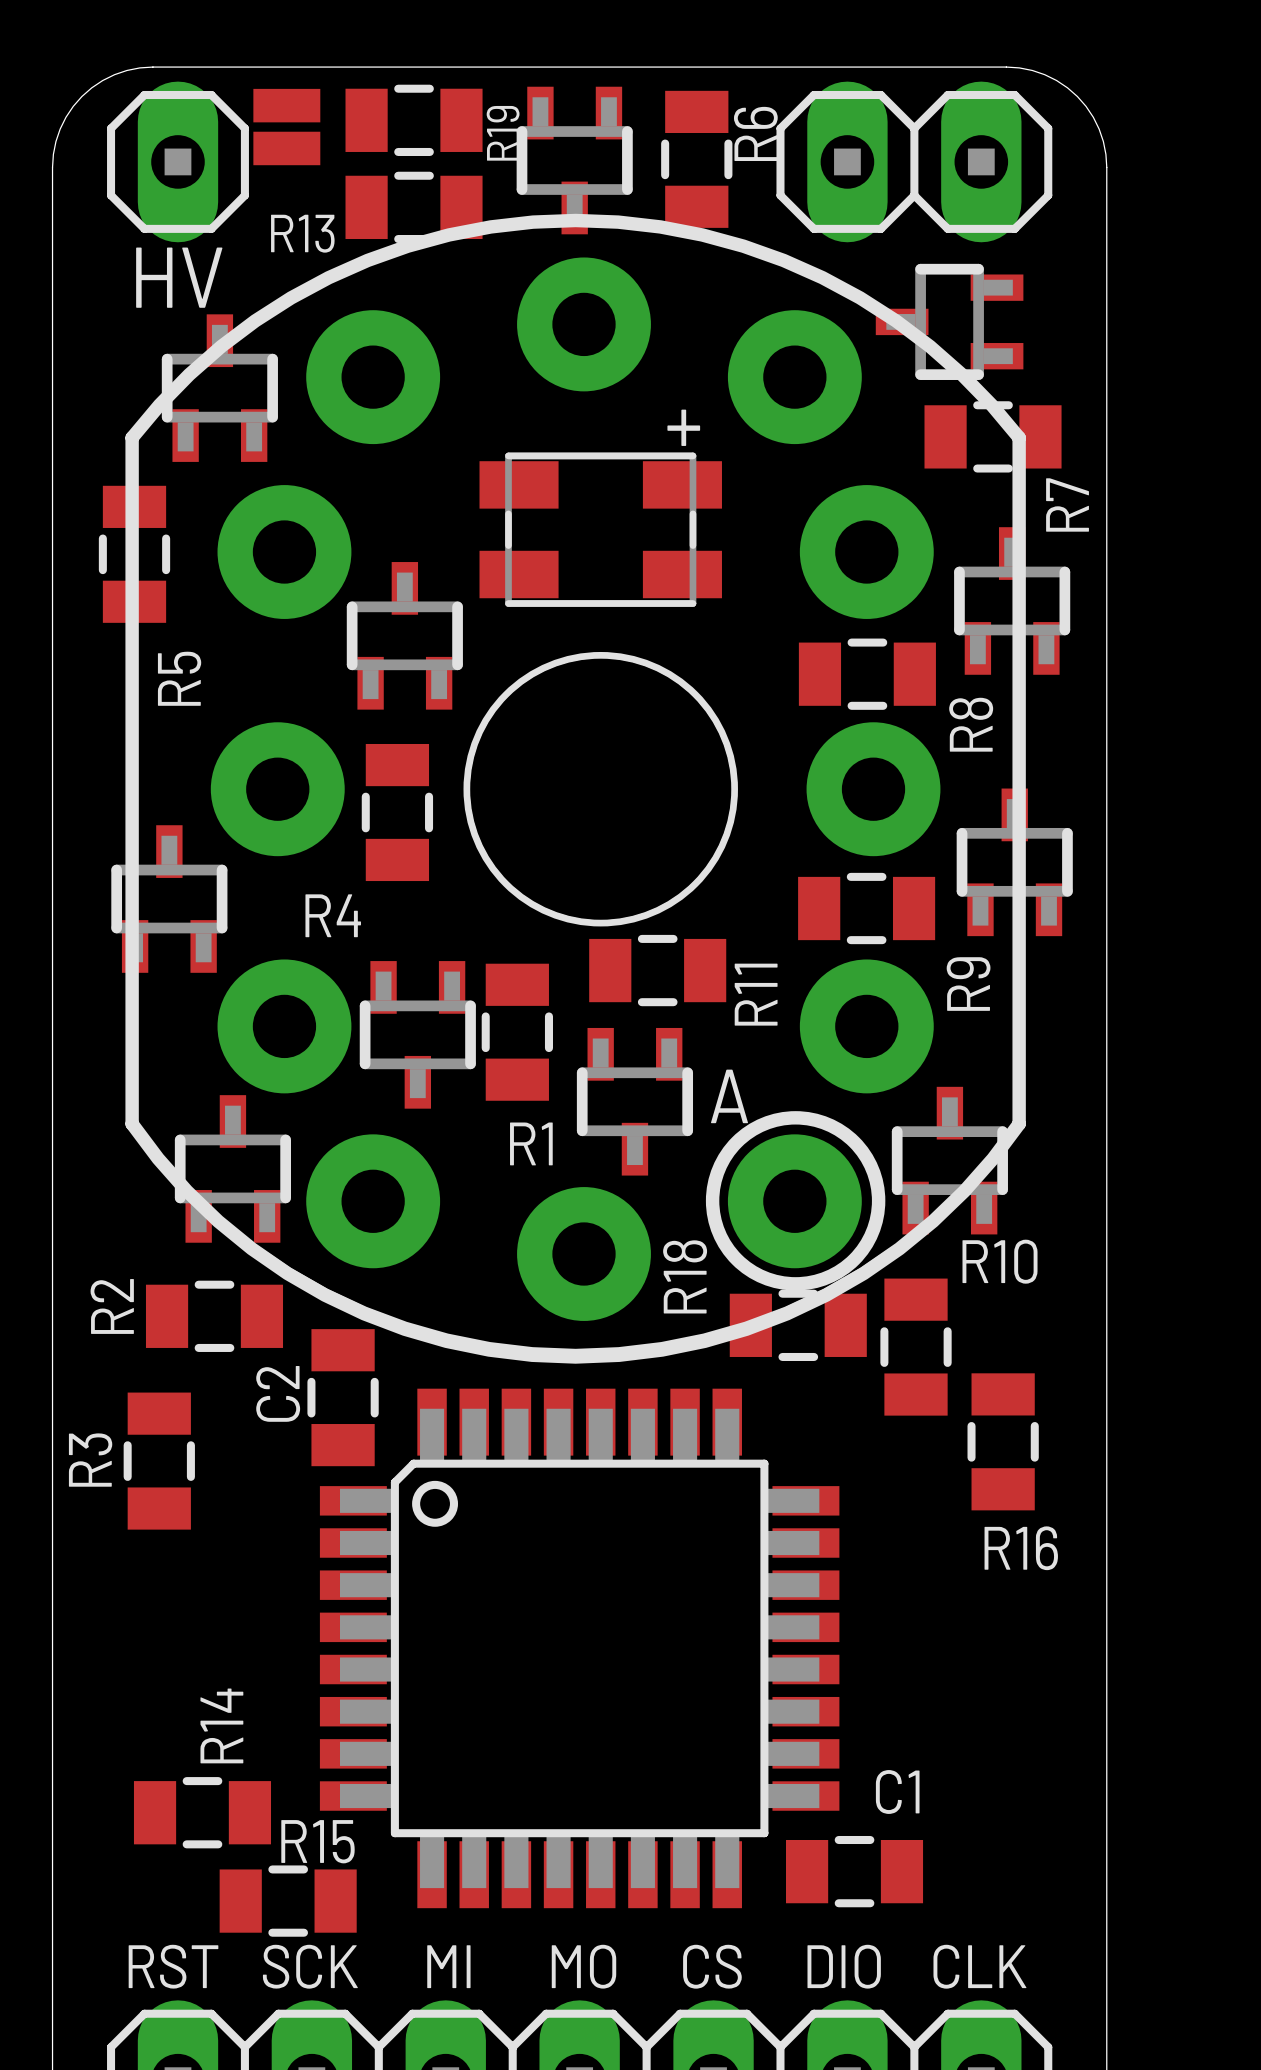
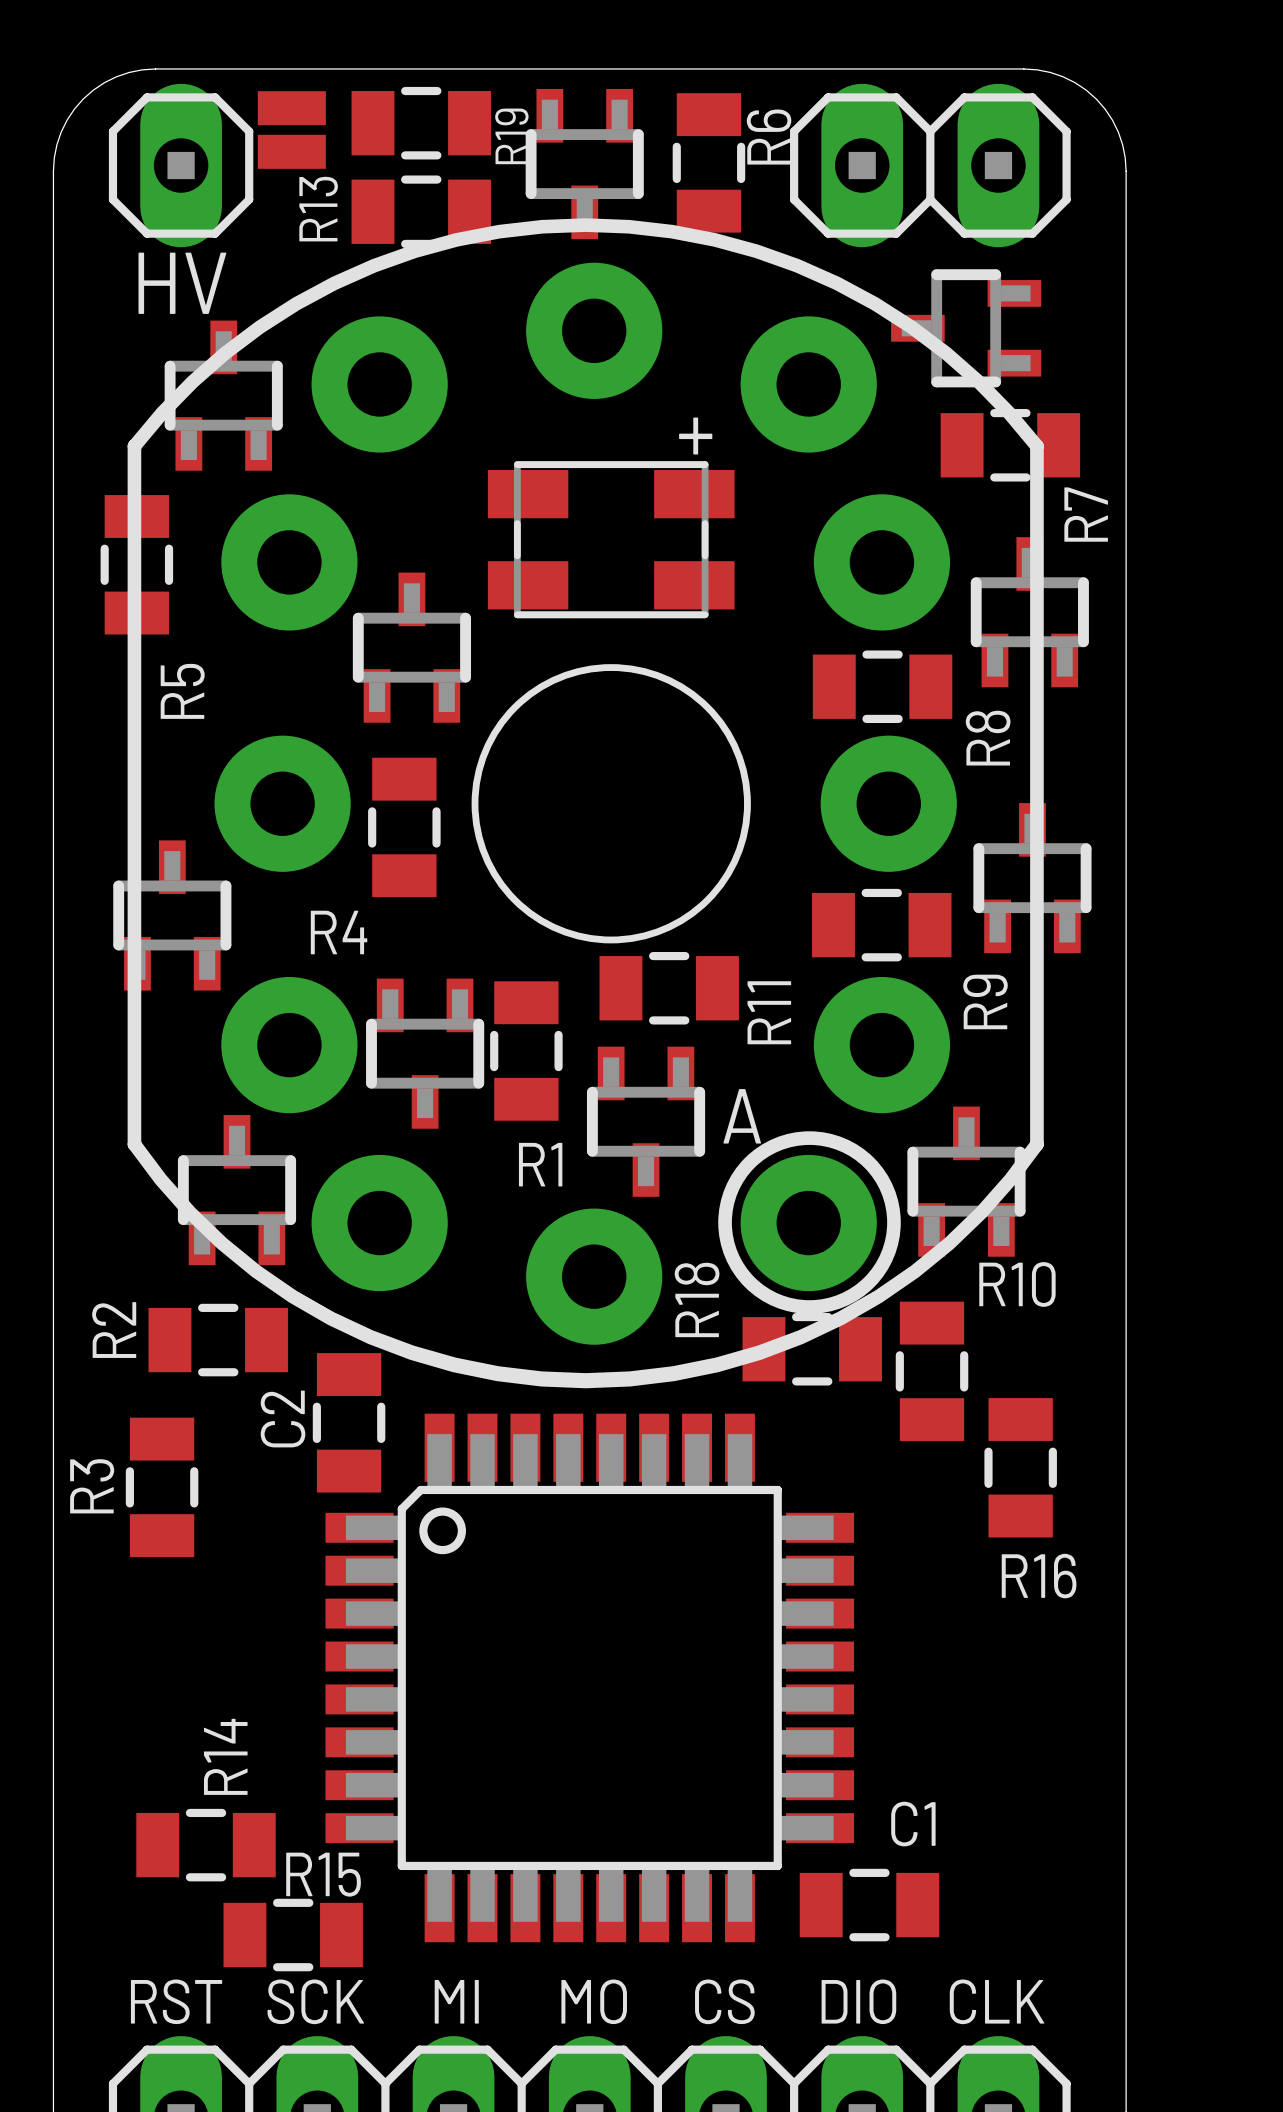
R13 name rotation: 0° (302, 233) -> 90° counterclockwise (318, 209)

